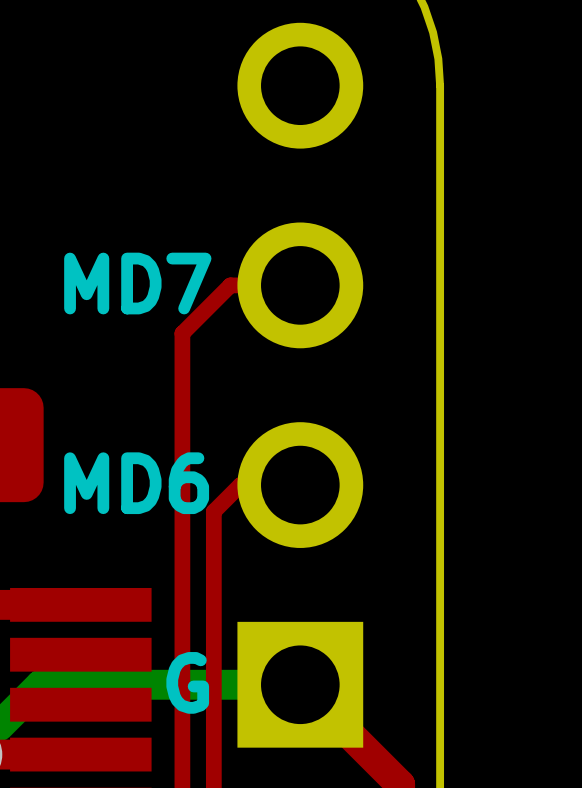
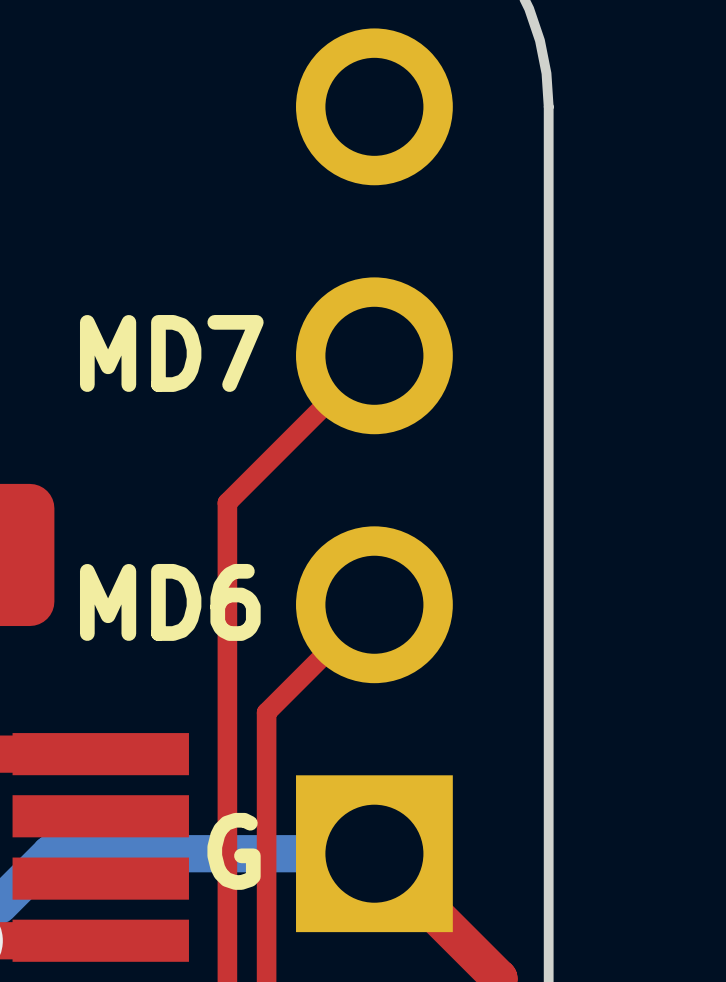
top track: (300, 285) (230, 285) (182, 333) (182, 403) -> (374, 355) (227, 502)
top track: (300, 485) (240, 485) (213, 511) (213, 571) -> (374, 604) (266, 712)

